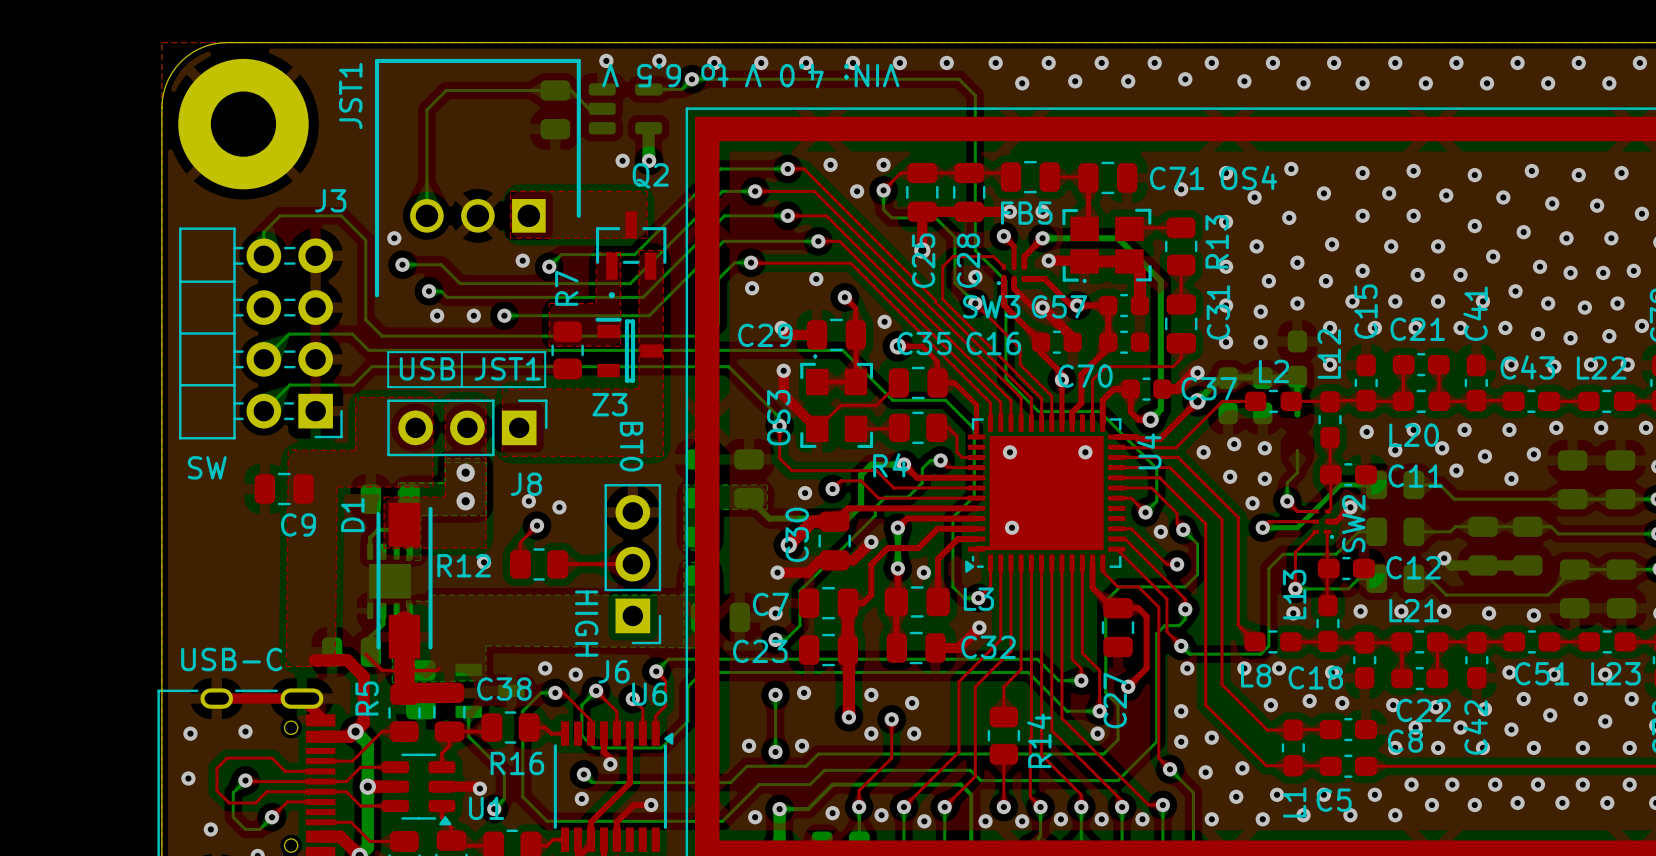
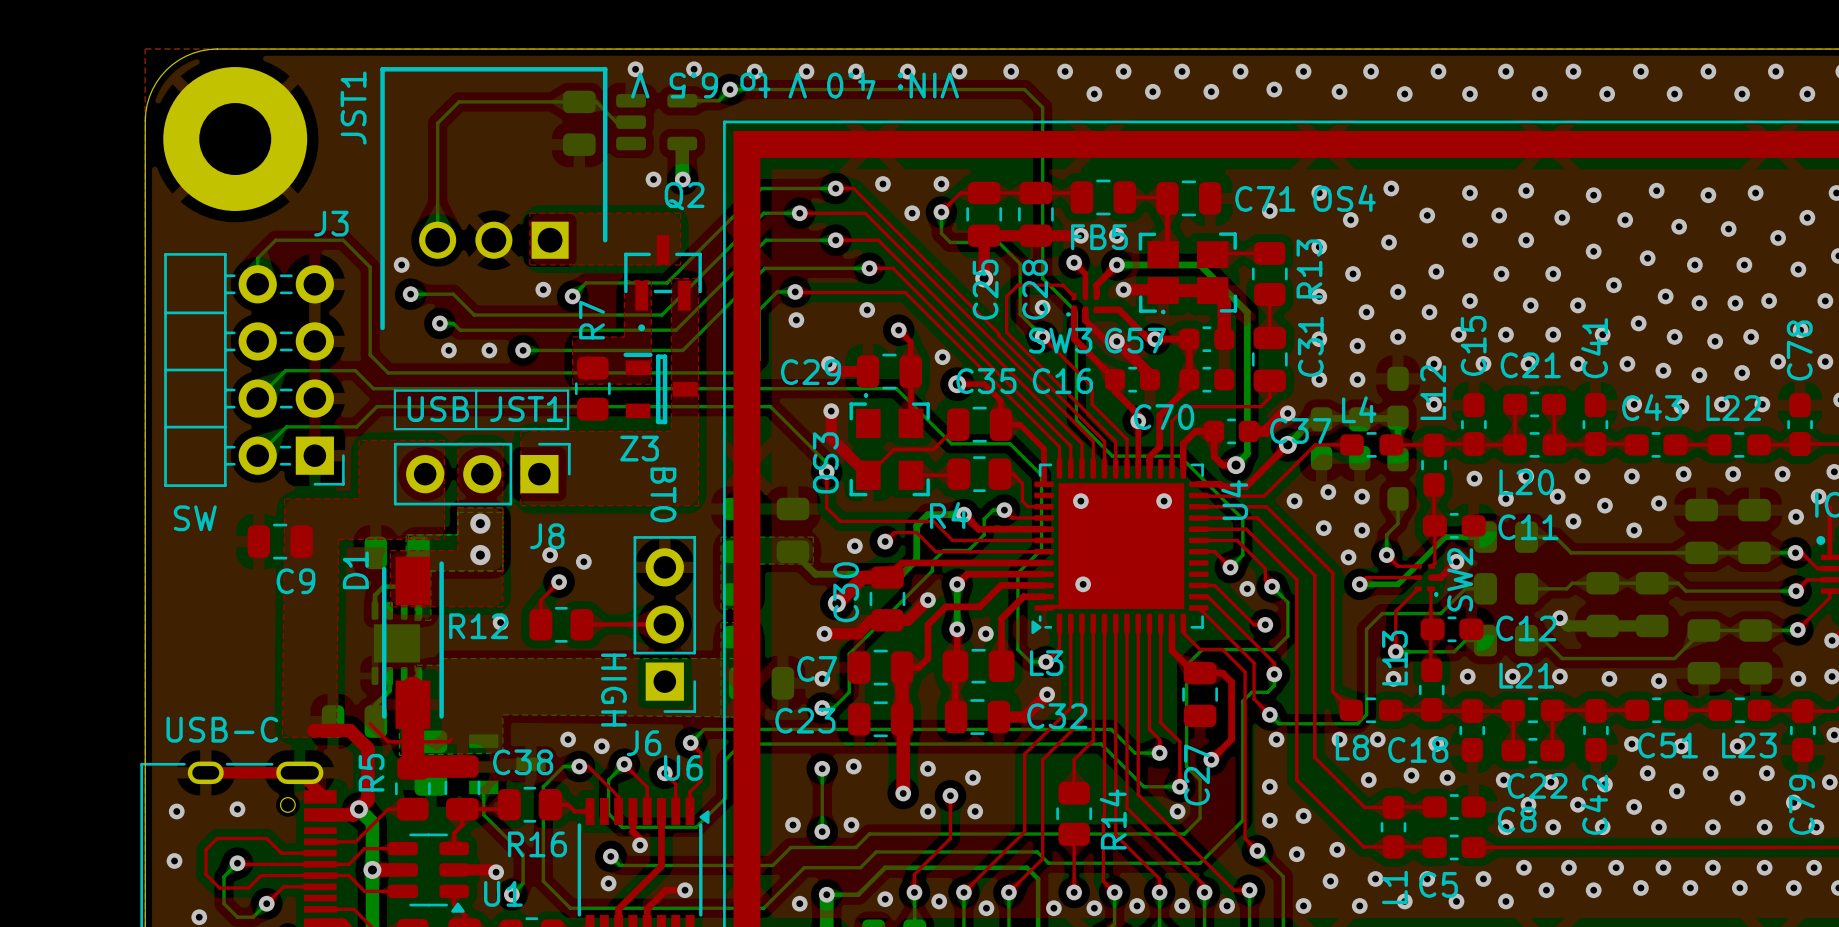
L2 name: L2 (1273, 371) -> L4 (1359, 409)
top track: (817, 381) (856, 381) -> none
part: none -> (1398, 479)

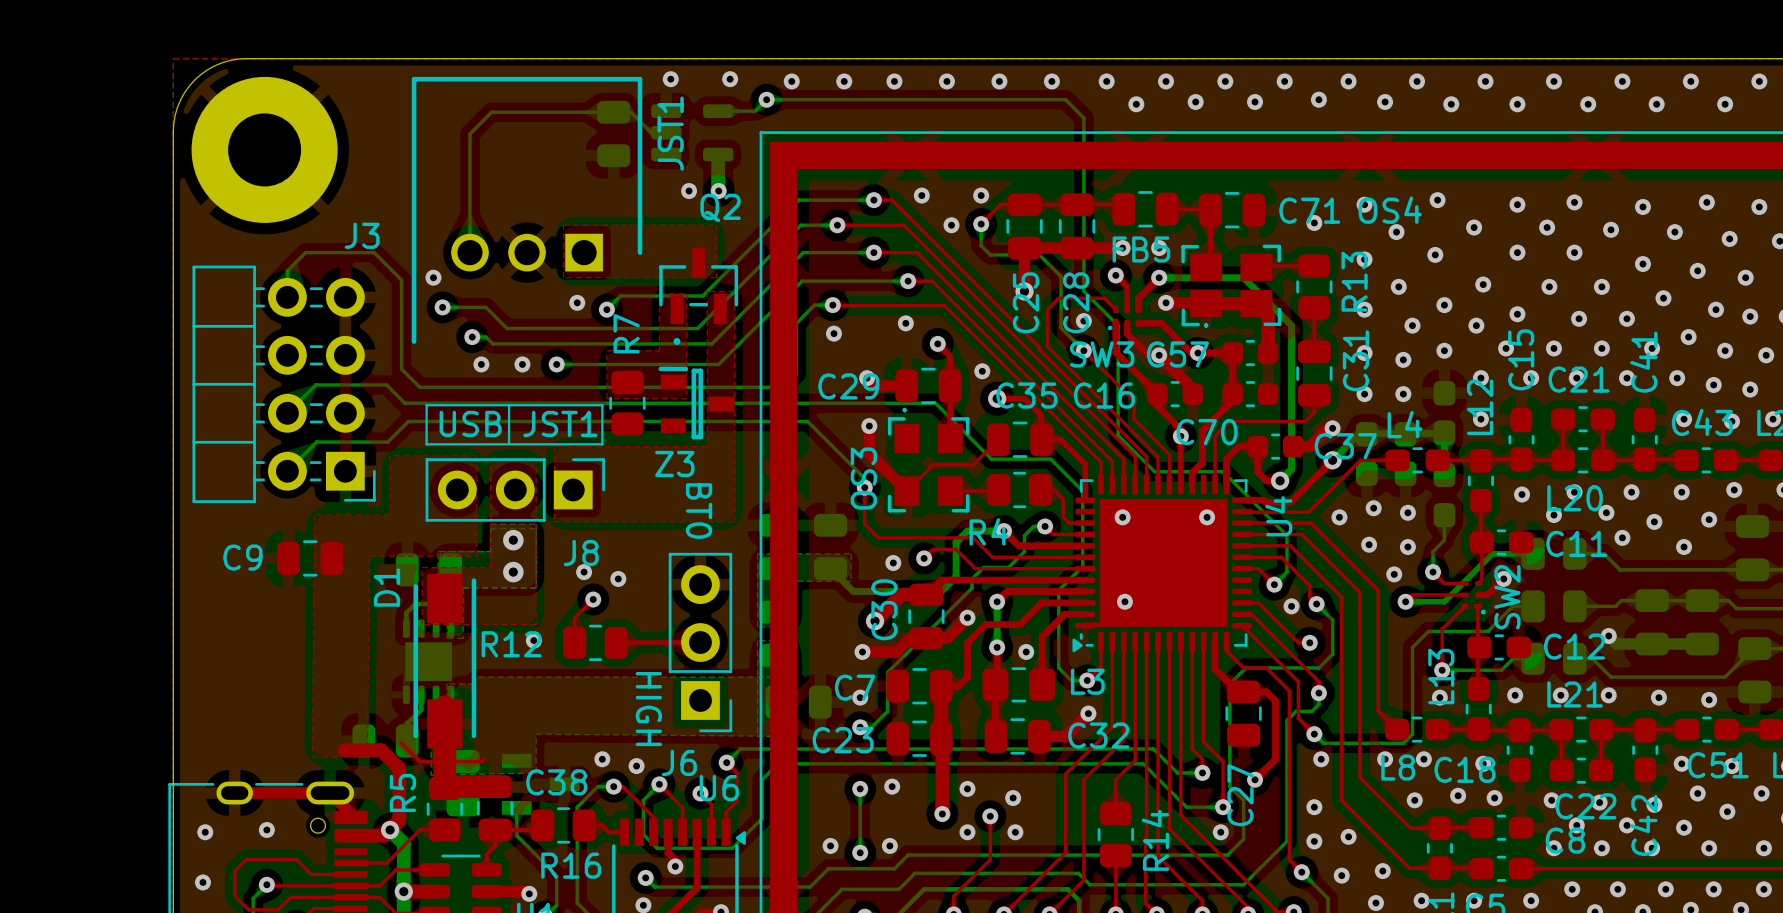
text: VIN: 4.0 V to 6.5 V (795, 86) -> none
JST1 name position: JST1 (353, 108) -> JST1 (670, 133)
text: SW (195, 518) -> none
C9 name position: C9 (295, 581) -> C9 (242, 557)
text: USB-C (222, 729) -> none

